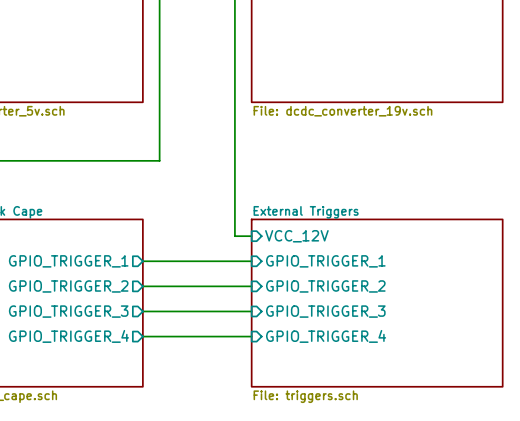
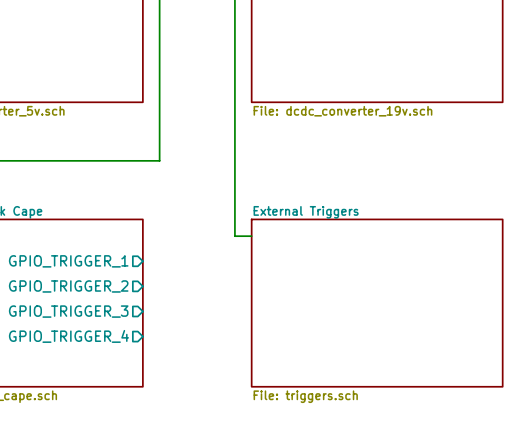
sheet pin: VCC_12V (296, 236) -> none
wire: (142, 261) (251, 261) -> none
sheet pin: GPIO_TRIGGER_1 (325, 261) -> none
wire: (142, 286) (251, 286) -> none
sheet pin: GPIO_TRIGGER_2 (325, 286) -> none
wire: (142, 311) (251, 311) -> none
sheet pin: GPIO_TRIGGER_3 (325, 311) -> none
wire: (142, 336) (251, 336) -> none
sheet pin: GPIO_TRIGGER_4 (326, 336) -> none

